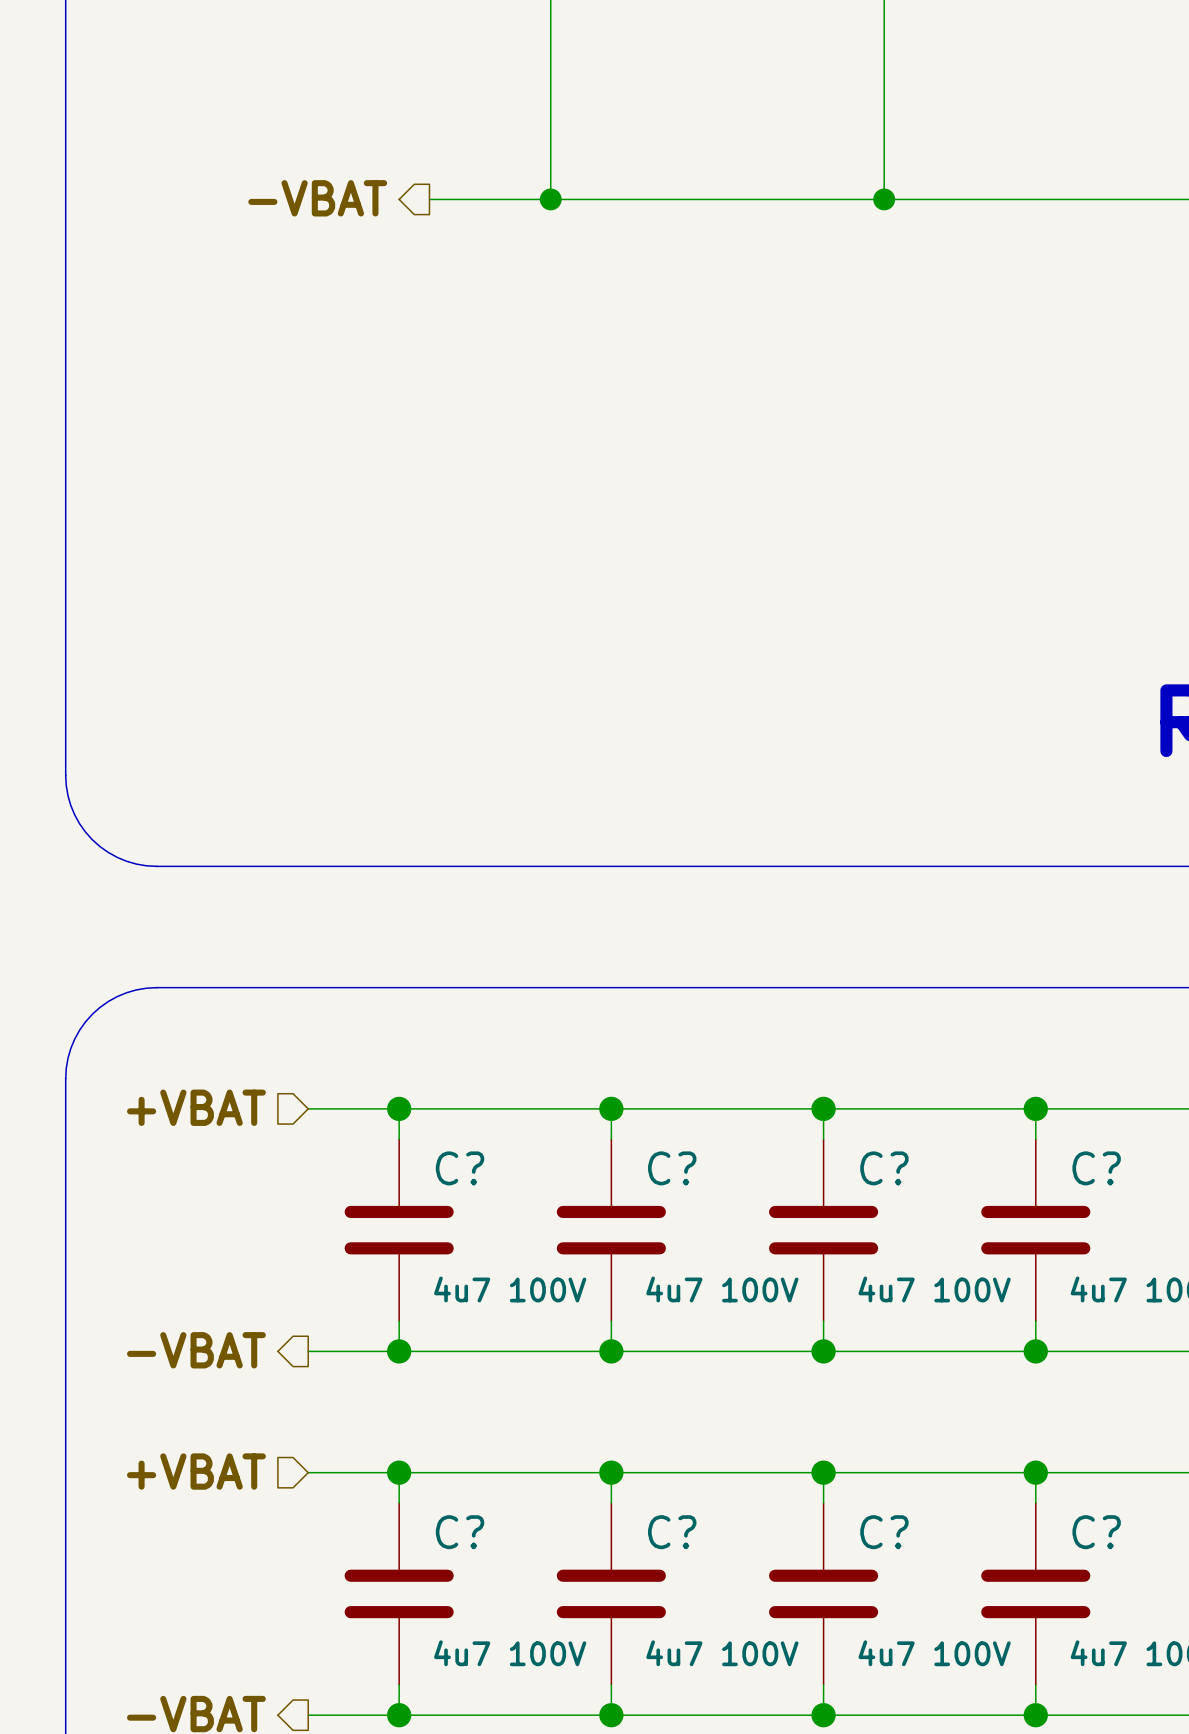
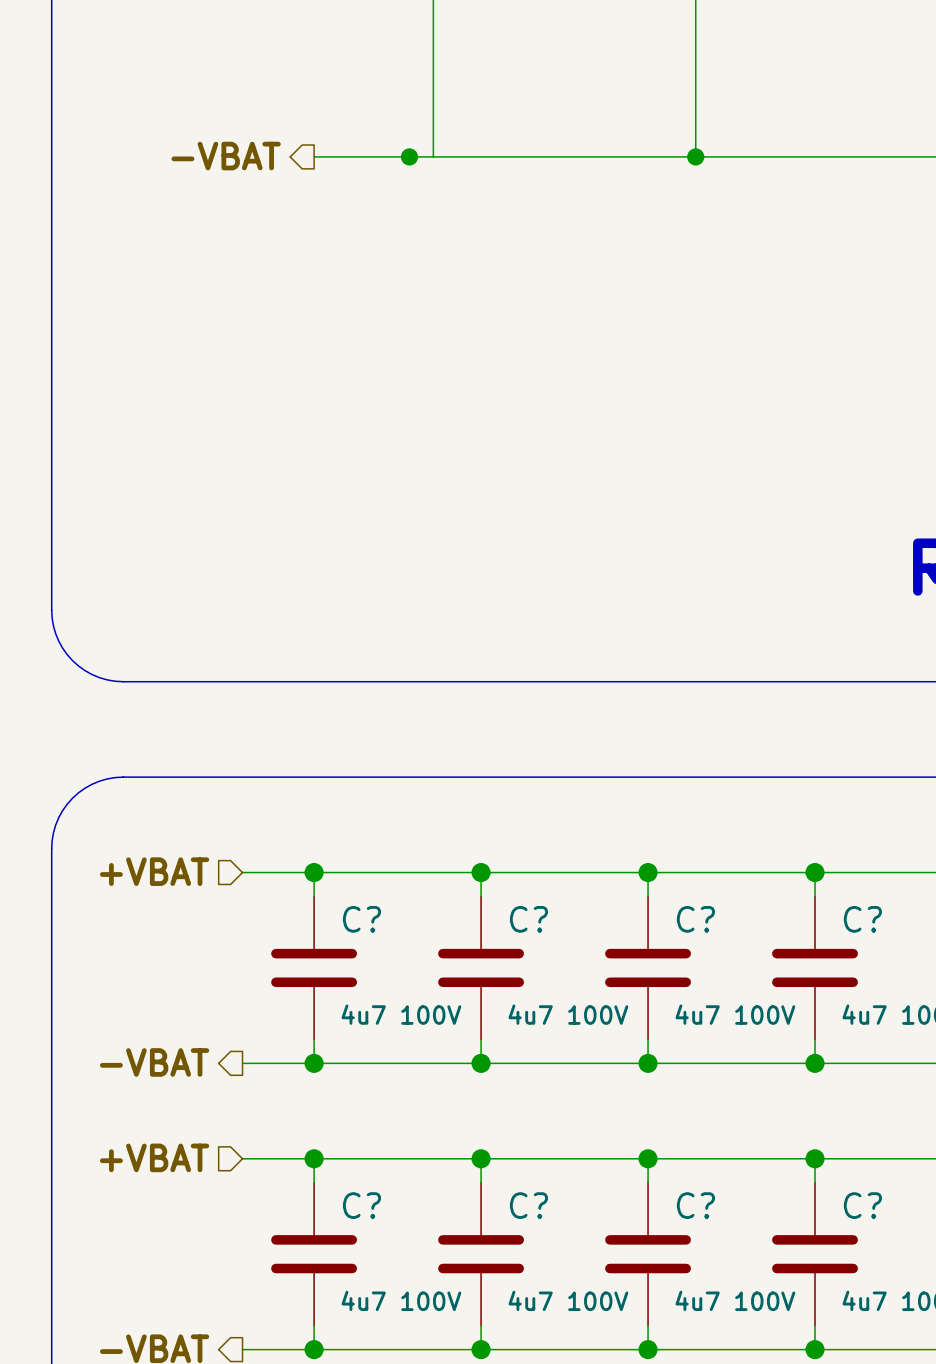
hierarchical label position: -VBAT (317, 198) -> -VBAT (226, 156)
wire: none -> (314, 156) (337, 156)
junction position: (550, 199) -> (409, 156)

